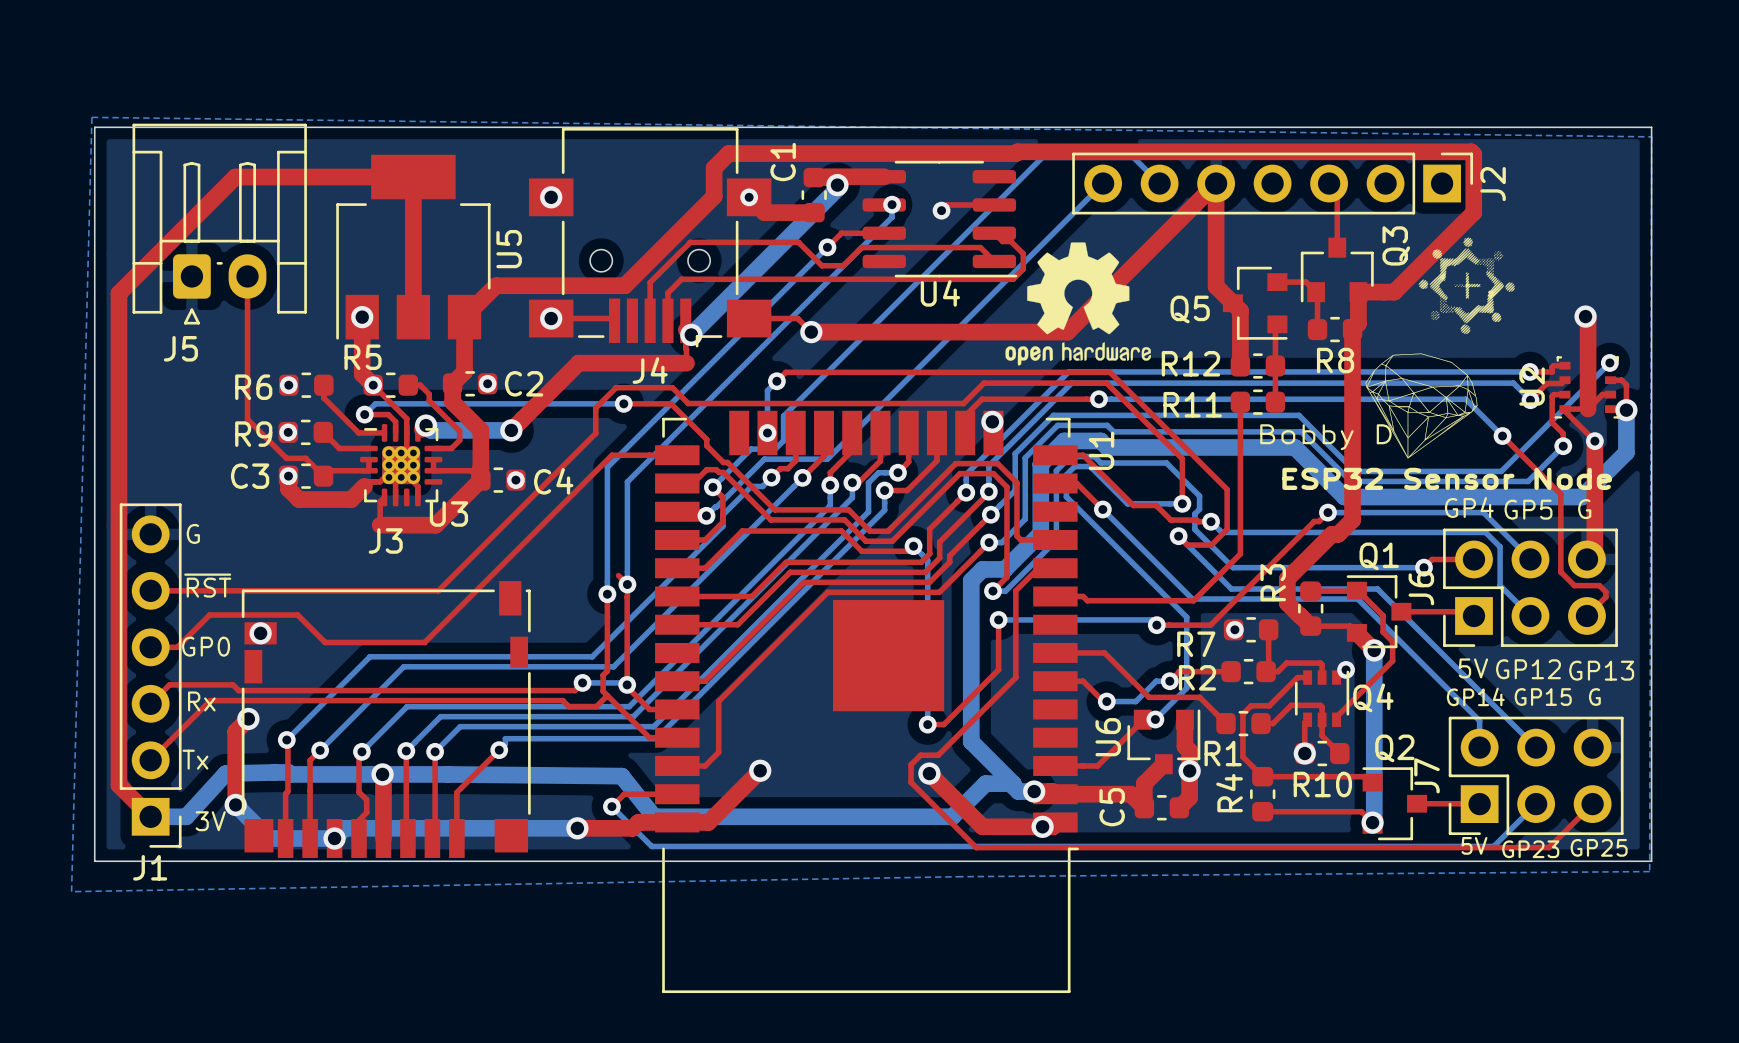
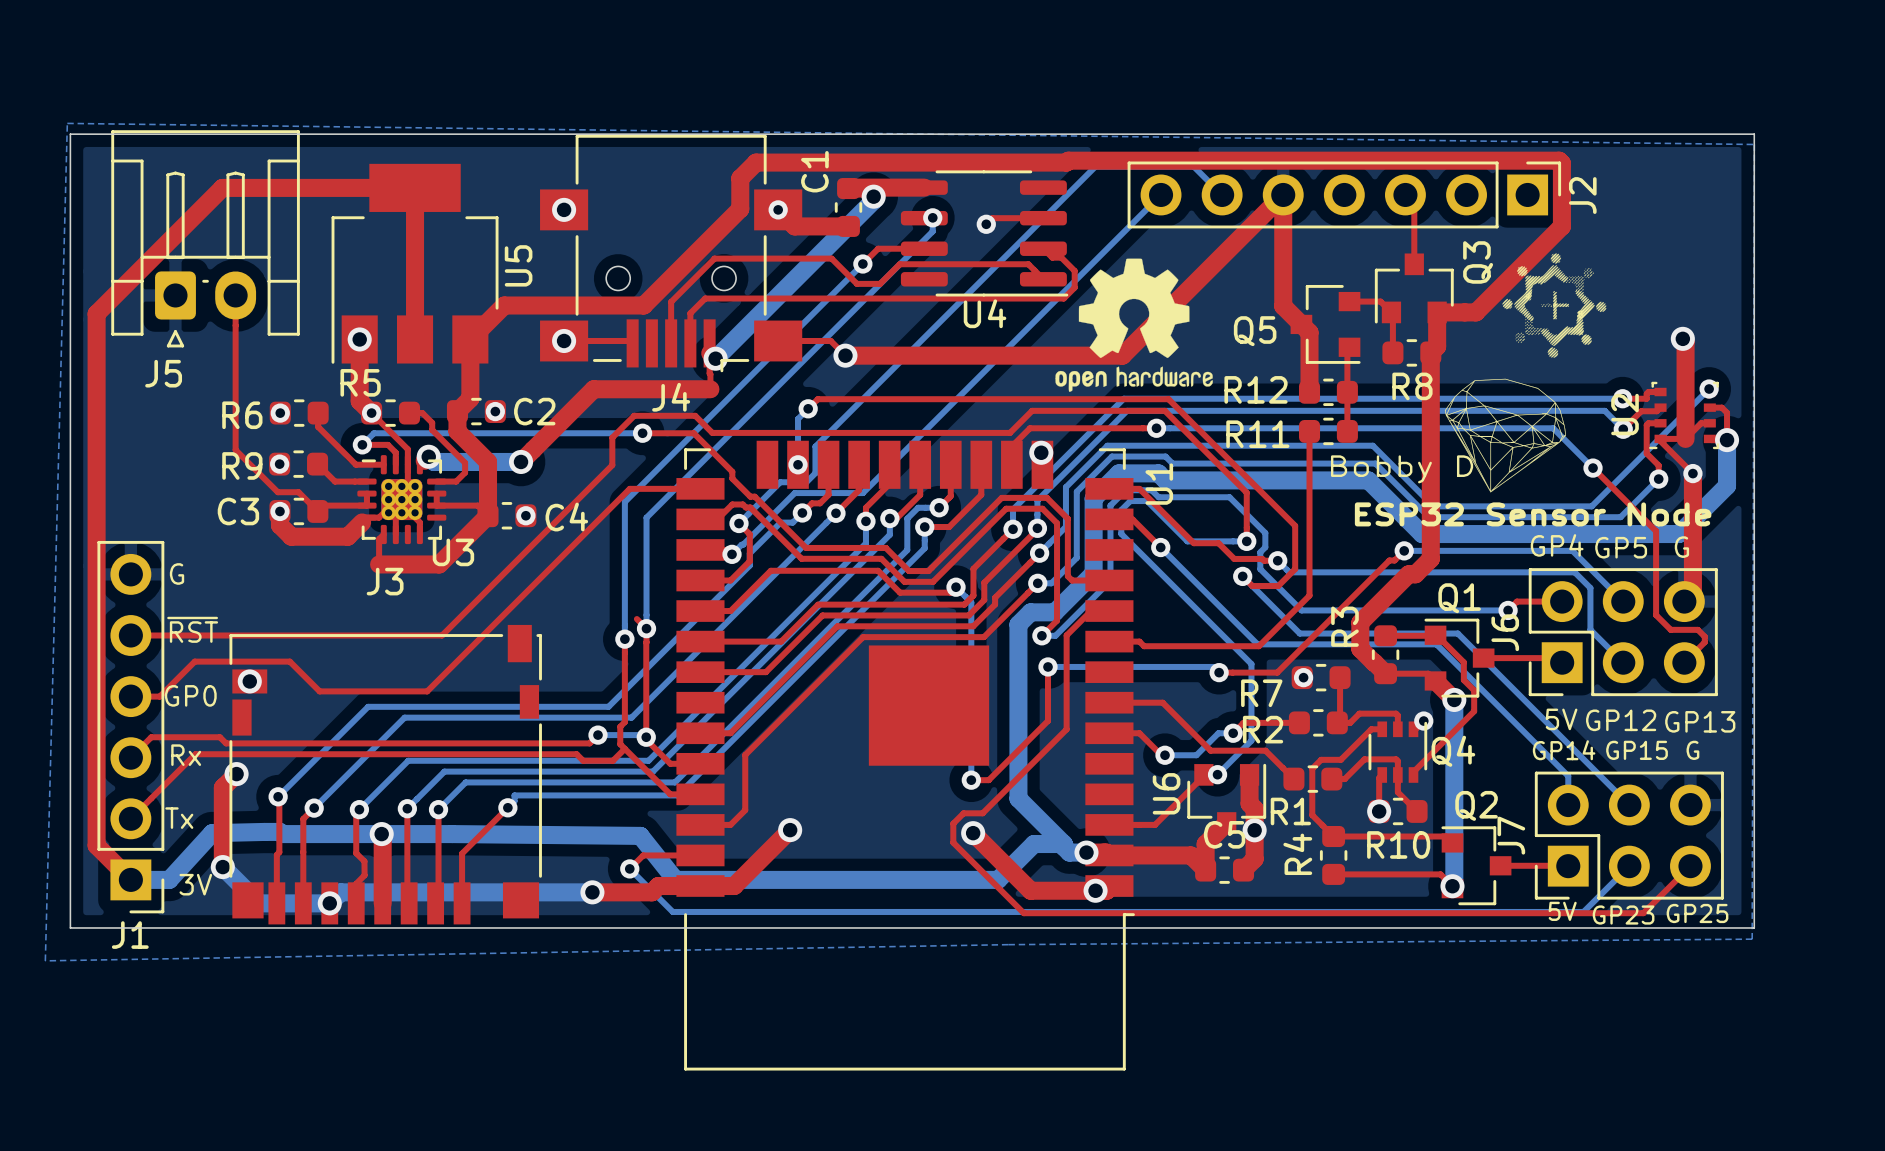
C5 name rotation: 0° (1112, 807) -> 90° clockwise (1224, 834)
C5 name position: C5 (1112, 807) -> C5 (1224, 834)

